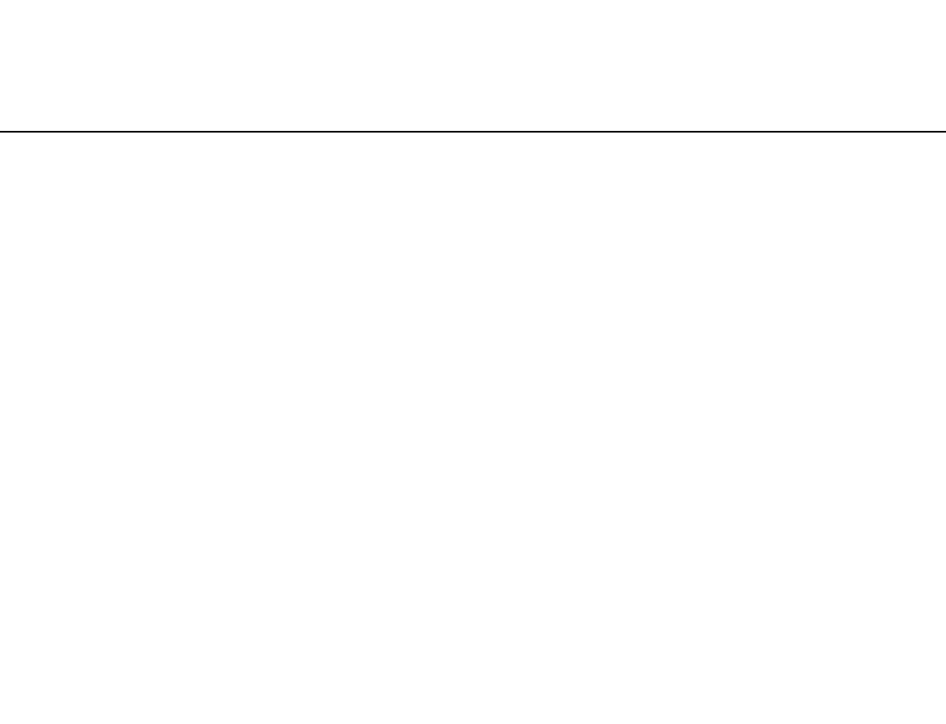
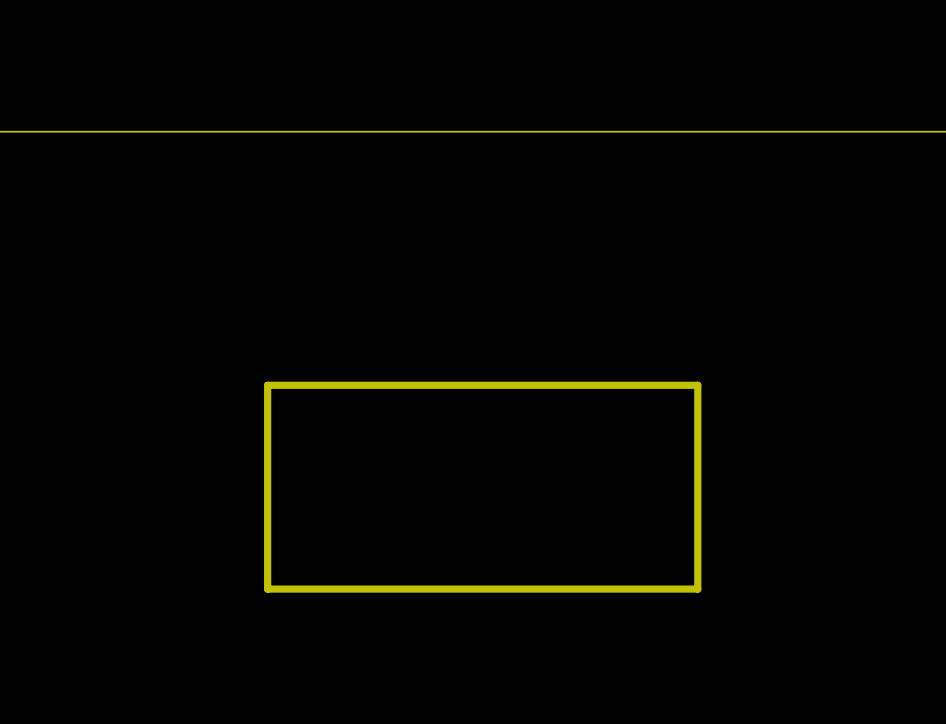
part: none -> (482, 487)

